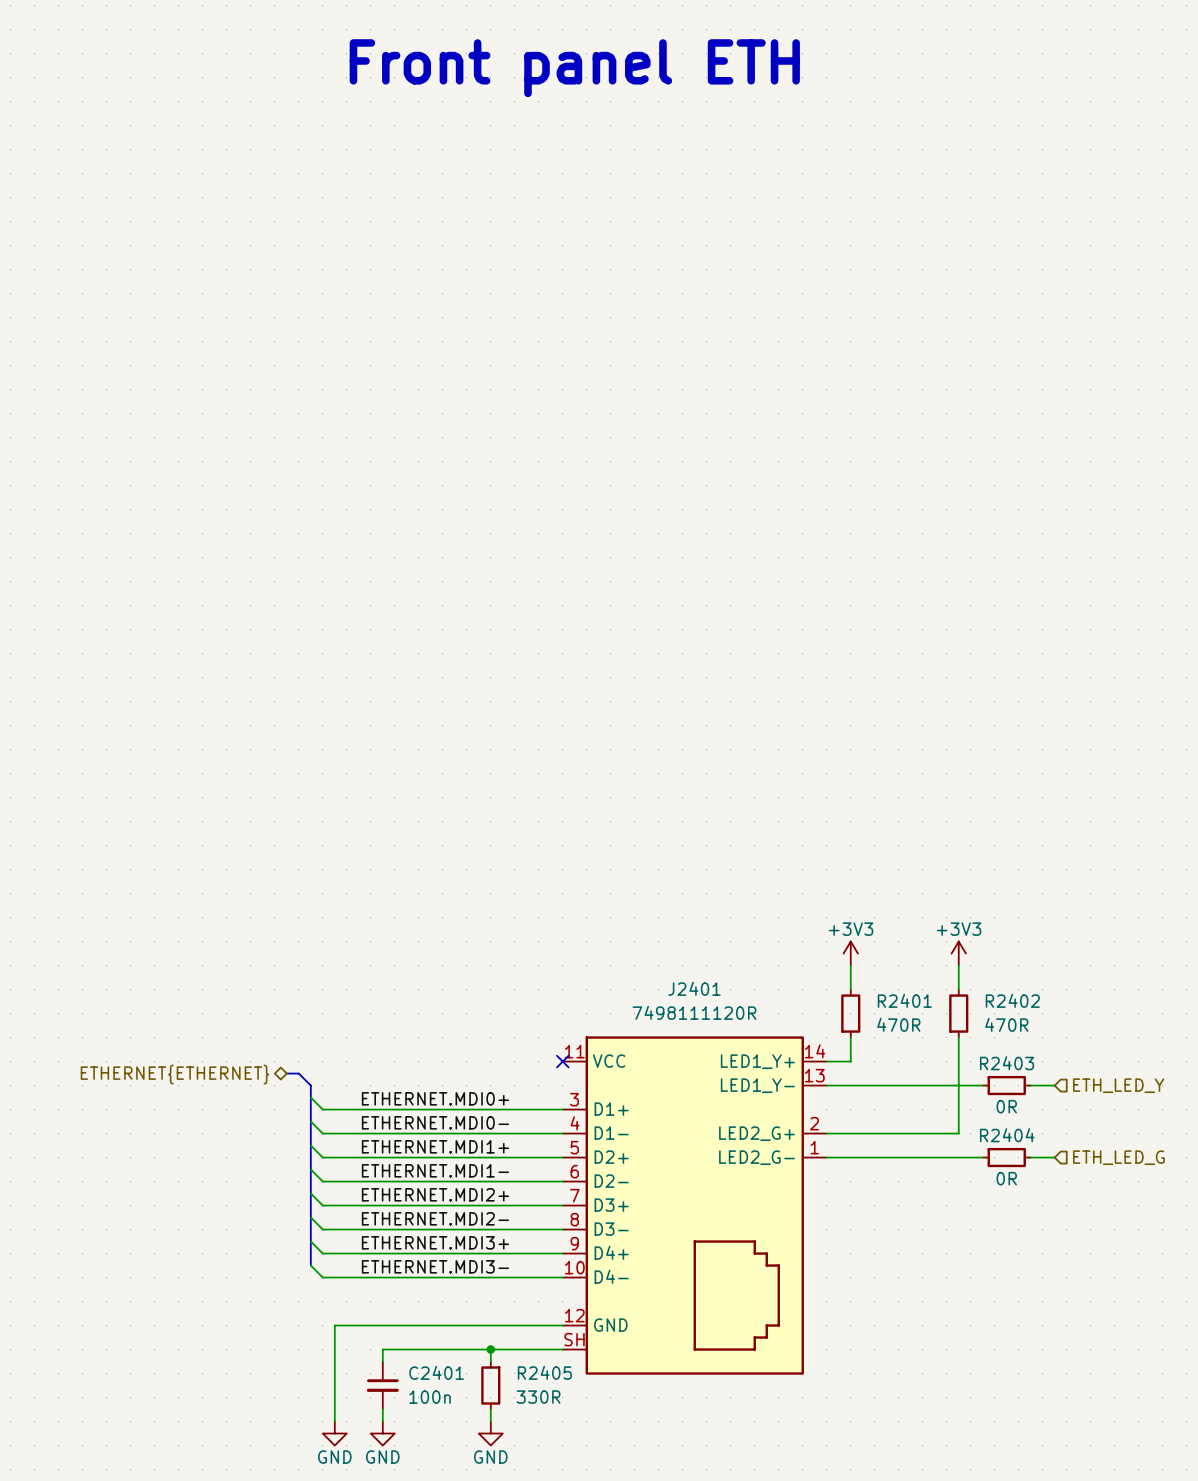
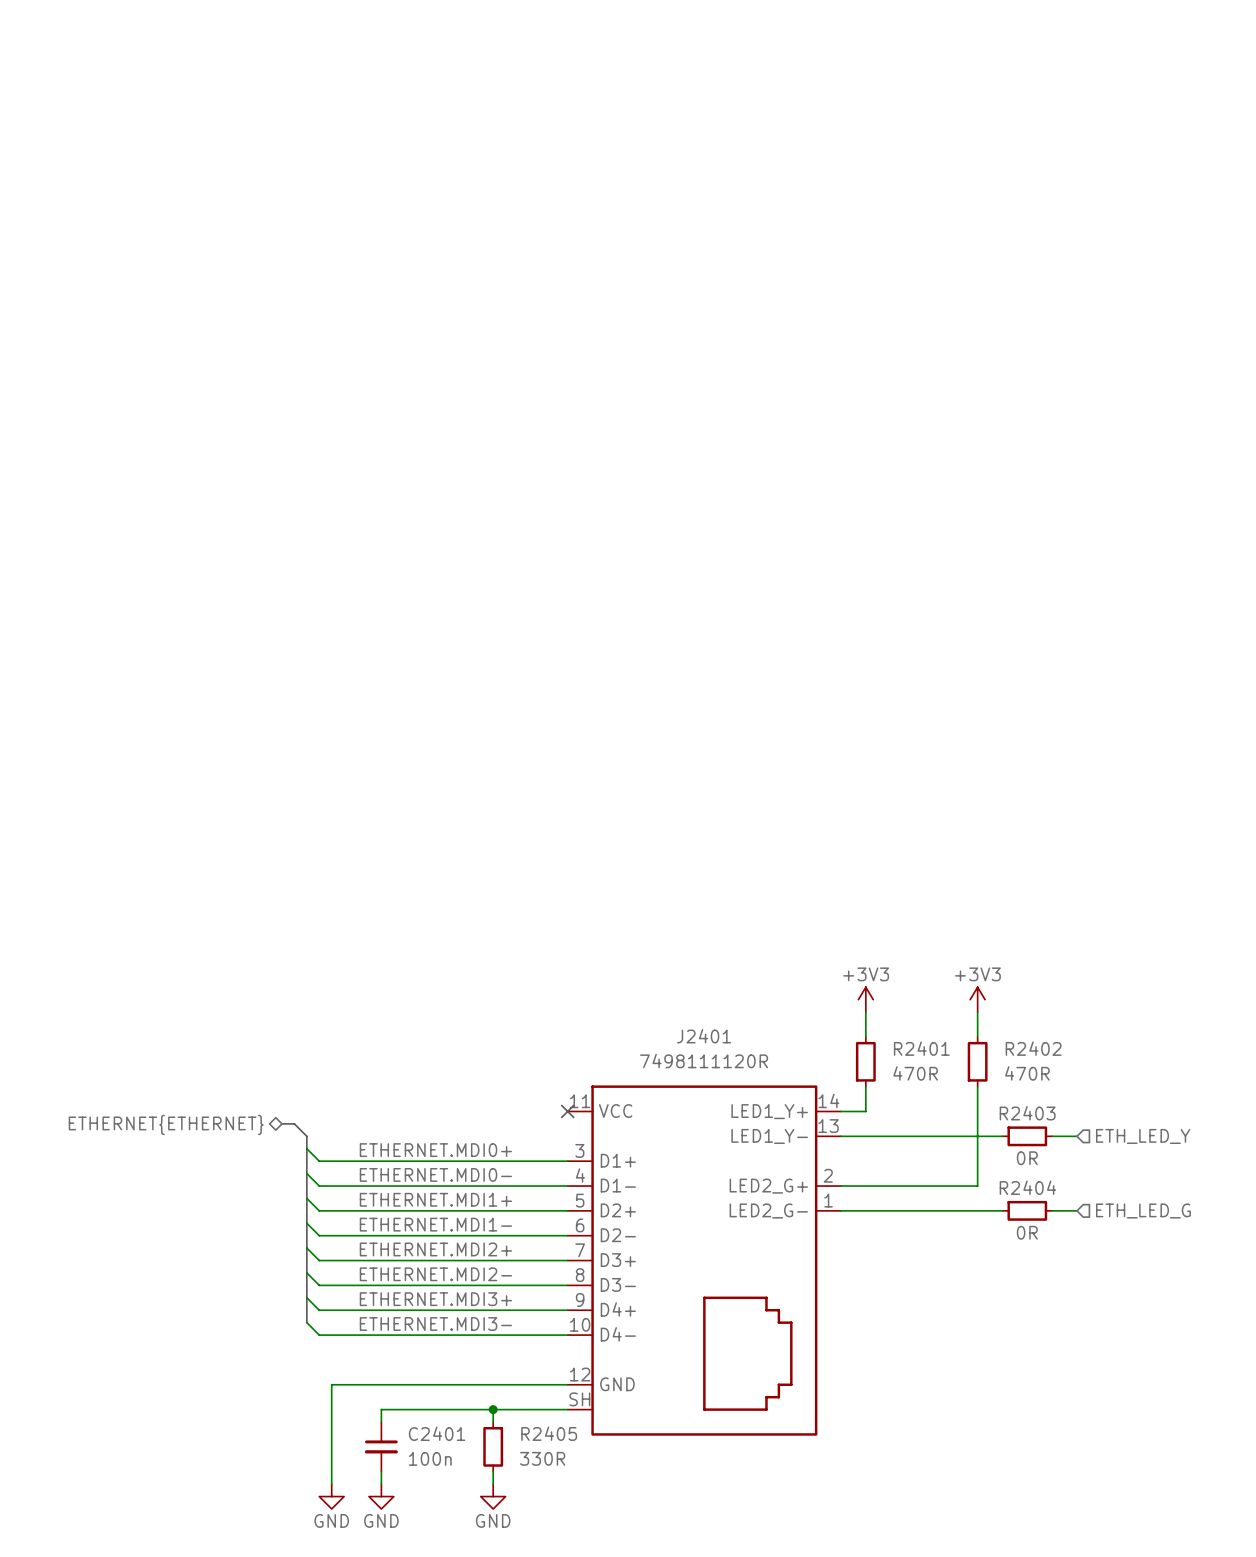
text: Front panel ETH (574, 68) -> none

